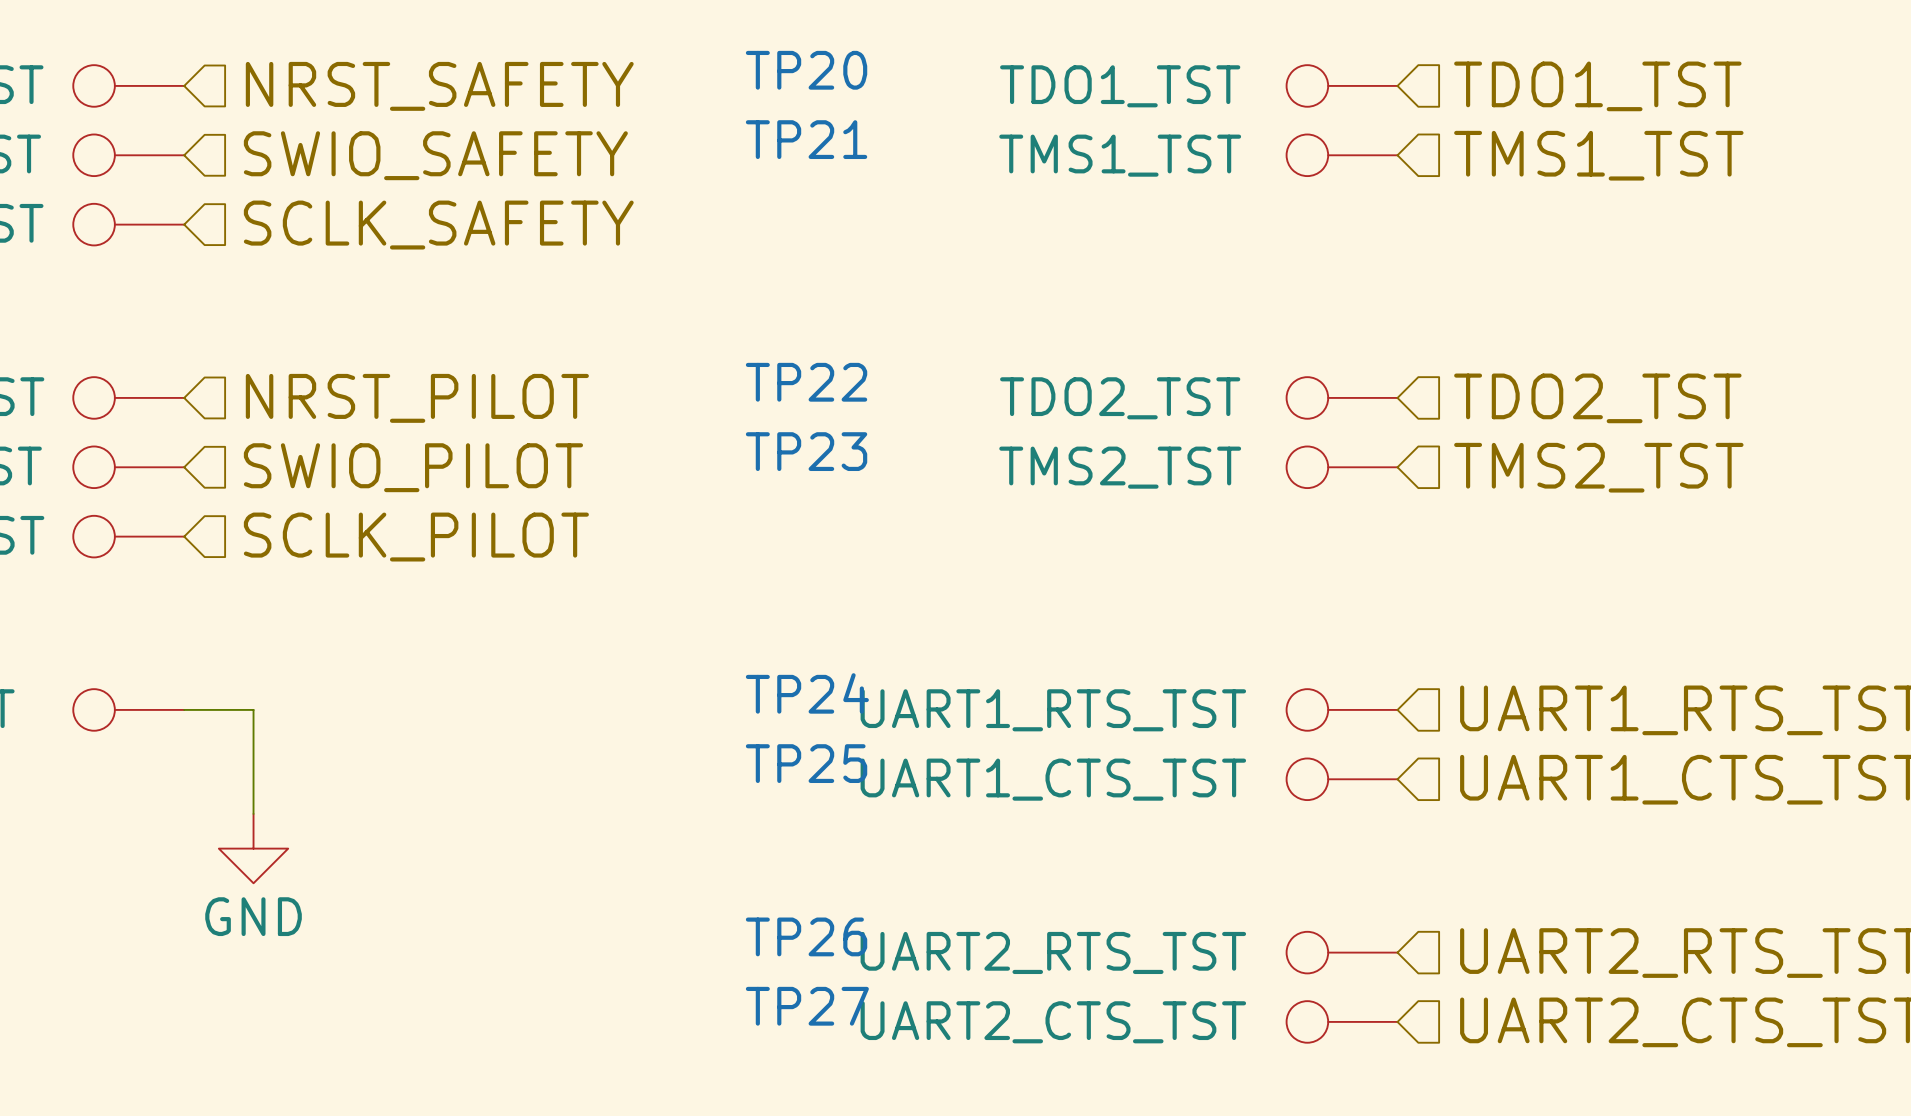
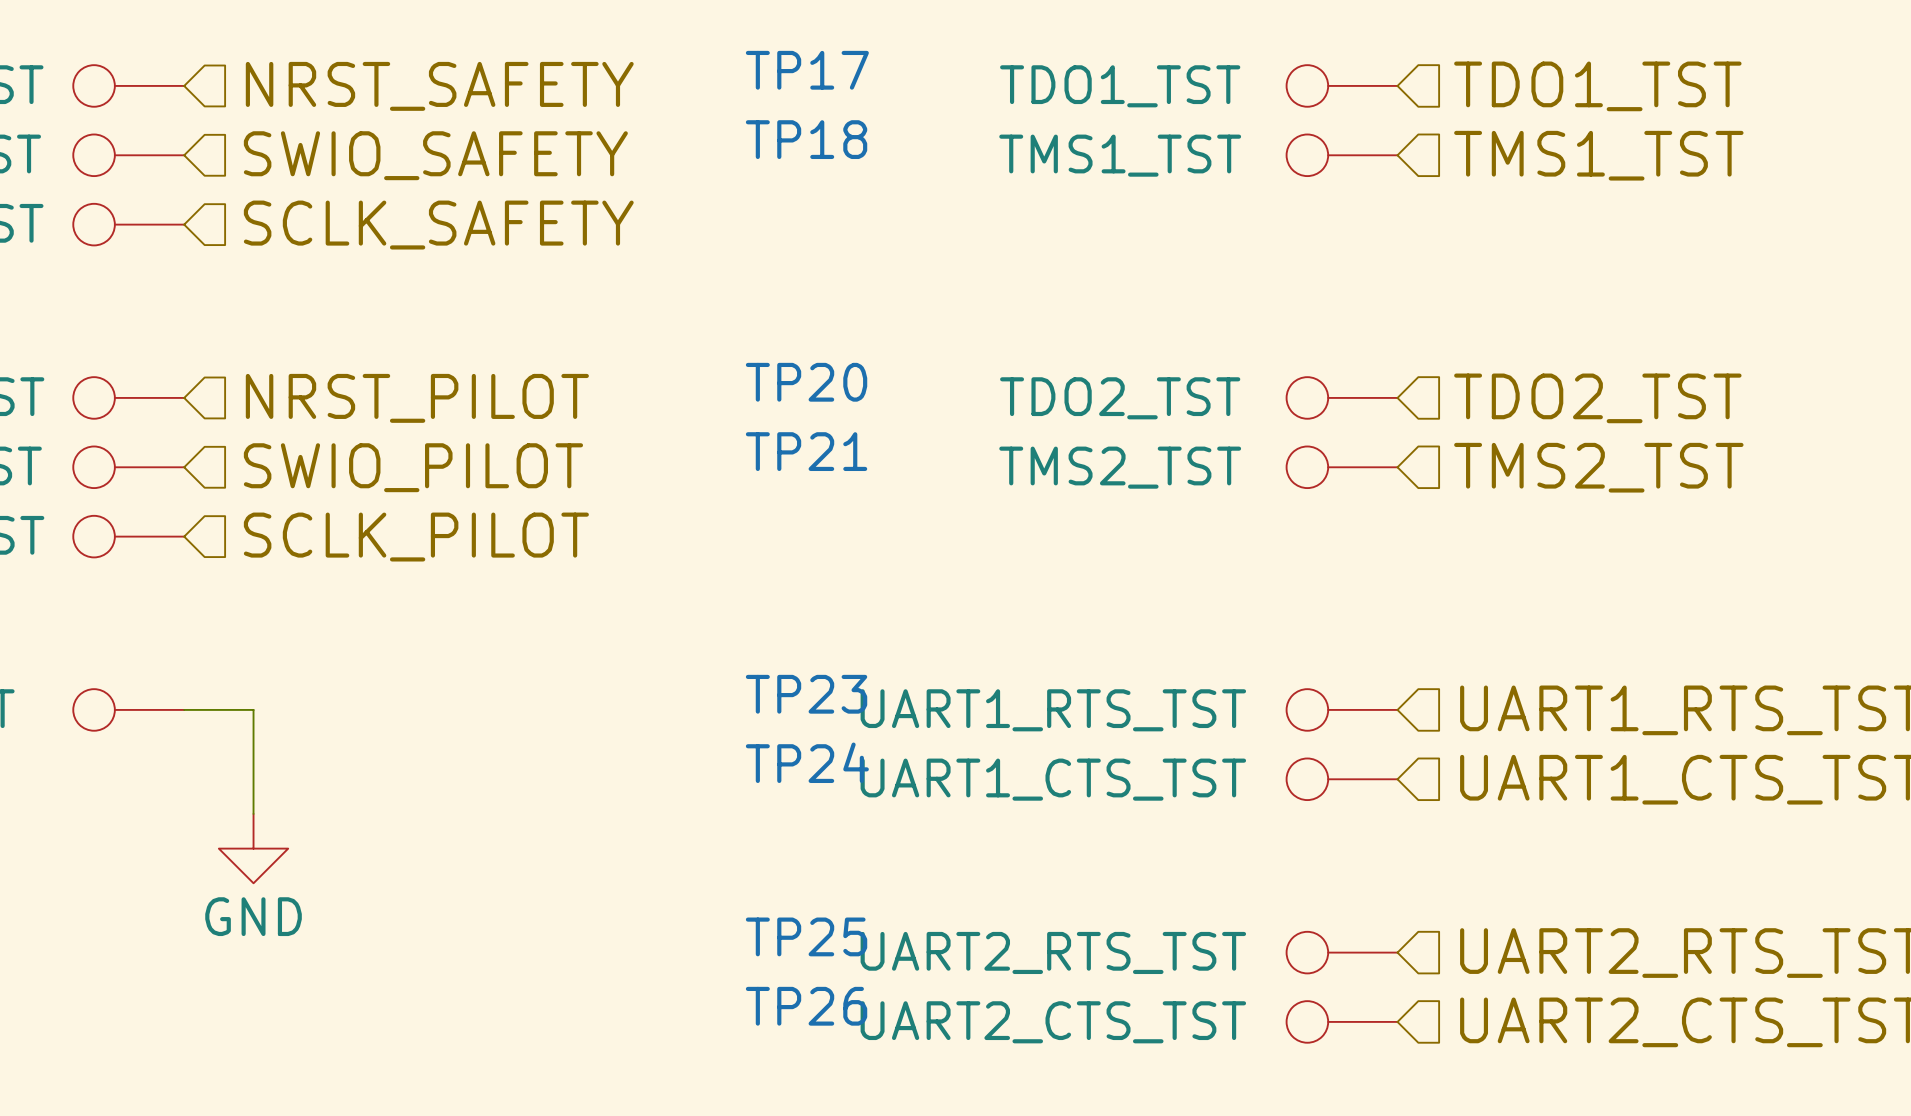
TP20 name: TP20 (806, 70) -> TP17 (807, 70)
TP21 name: TP21 (806, 139) -> TP18 (806, 139)
TP22 name: TP22 (806, 382) -> TP20 (806, 382)
TP23 name: TP23 (806, 451) -> TP21 (806, 451)
TP24 name: TP24 (807, 693) -> TP23 (806, 694)
TP25 name: TP25 (806, 763) -> TP24 (807, 762)
TP26 name: TP26 (806, 936) -> TP25 (806, 936)
TP27 name: TP27 (807, 1006) -> TP26 (806, 1006)

